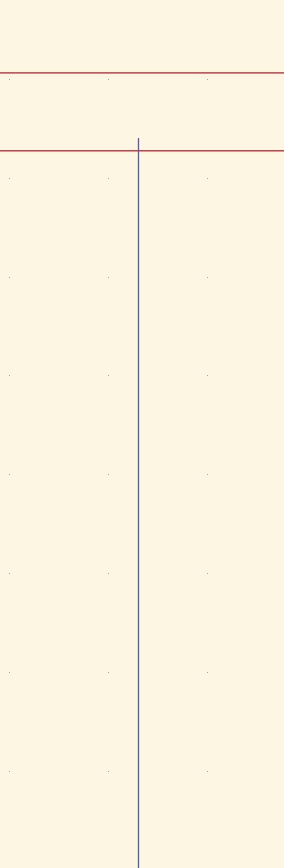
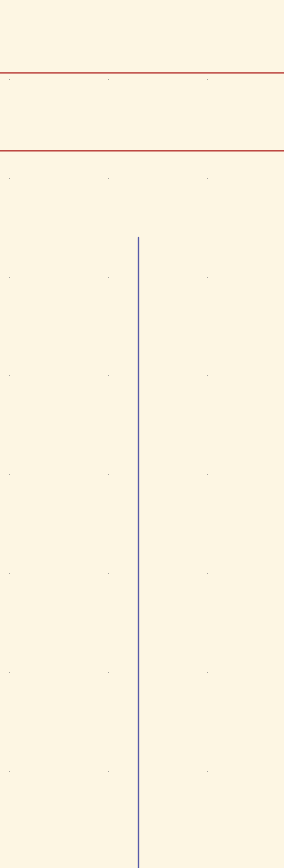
line: (138, 138) (138, 237) -> none

